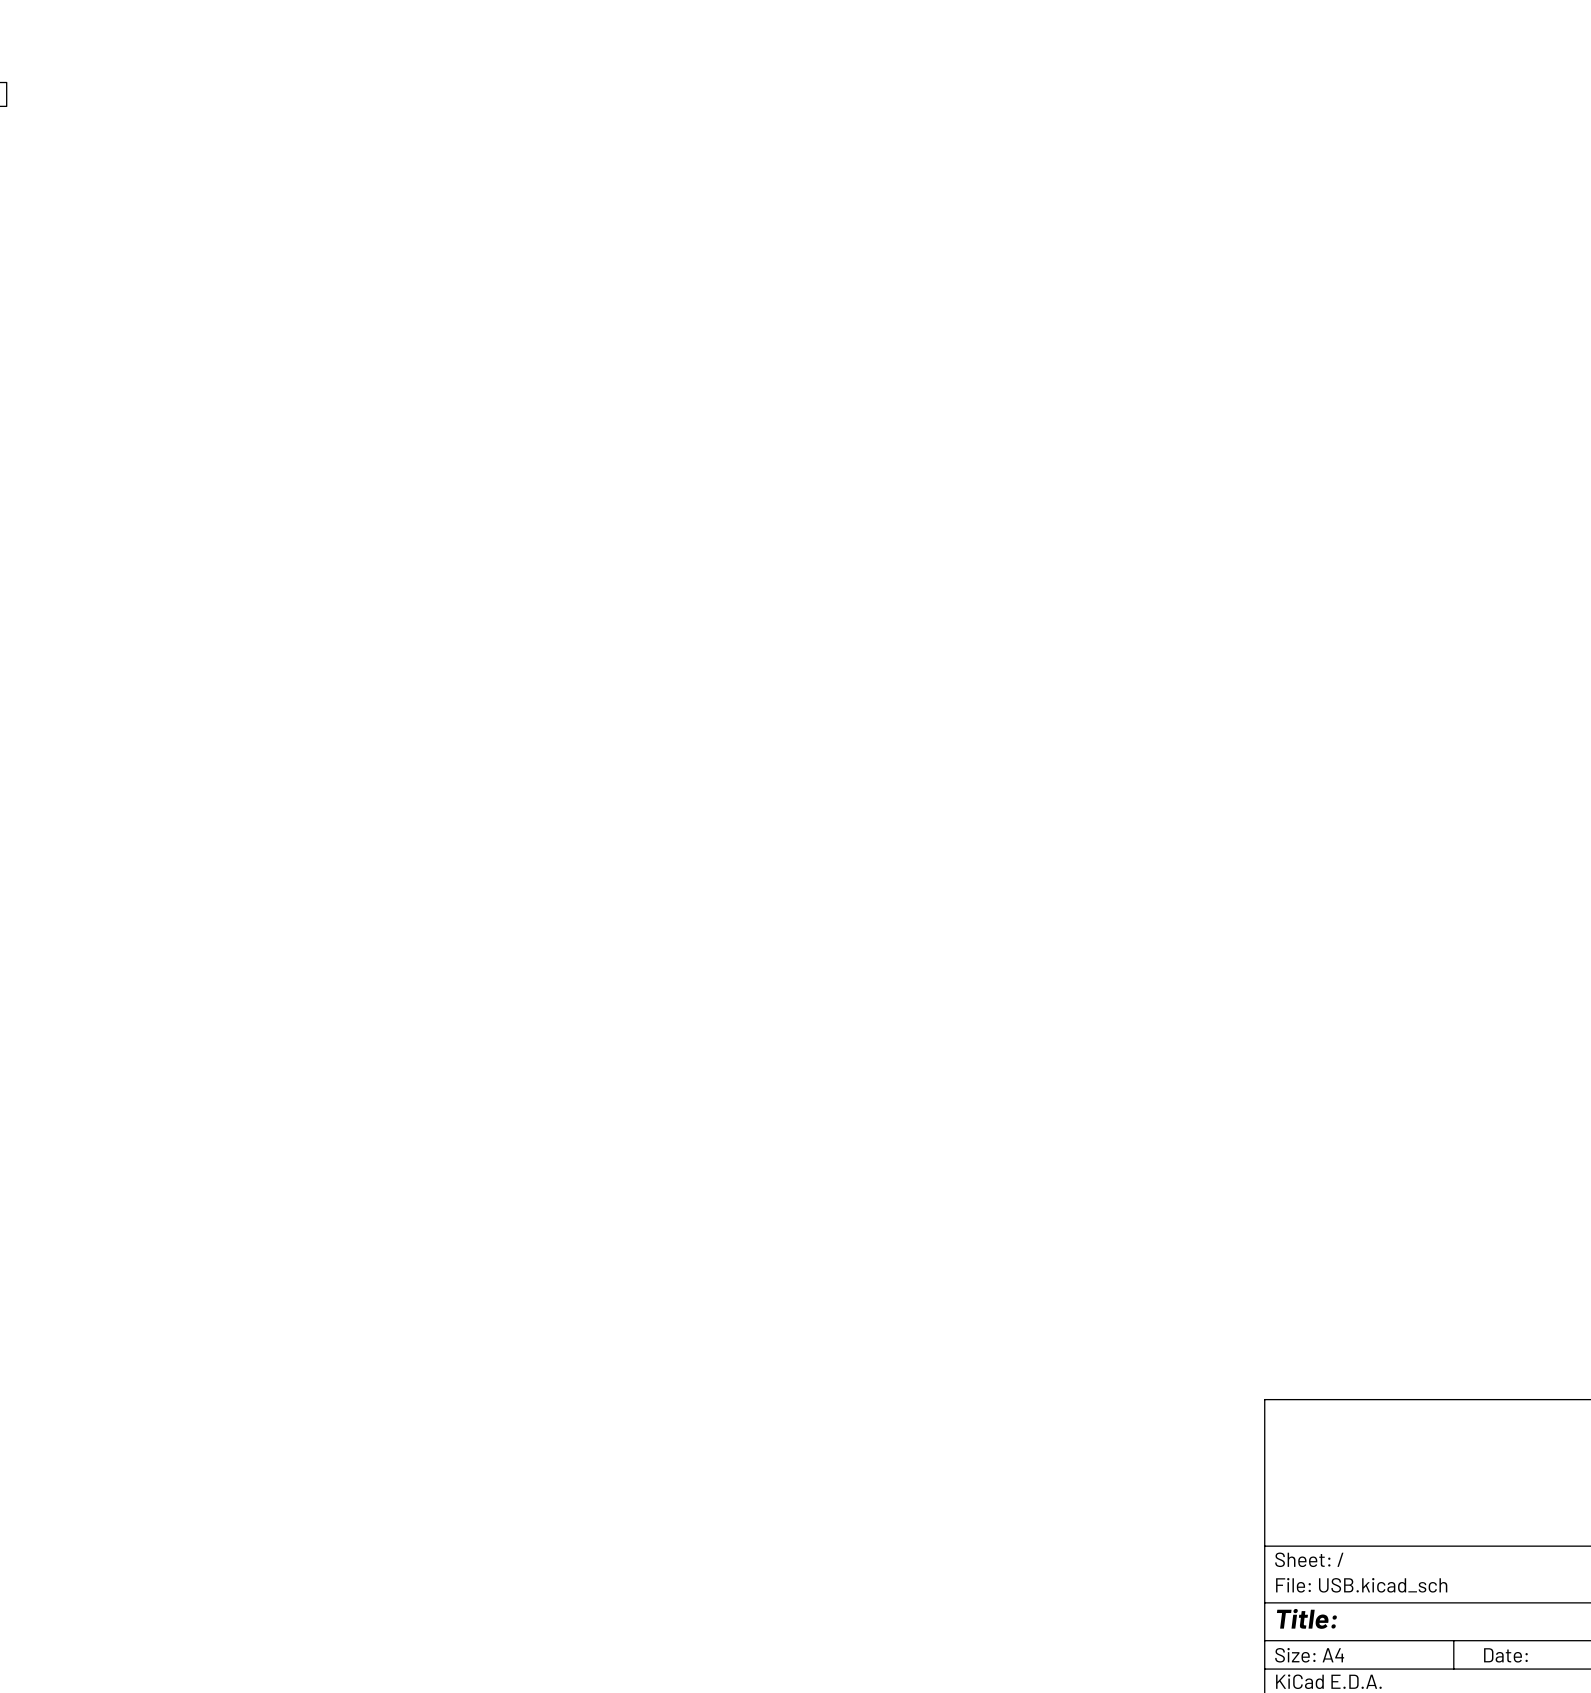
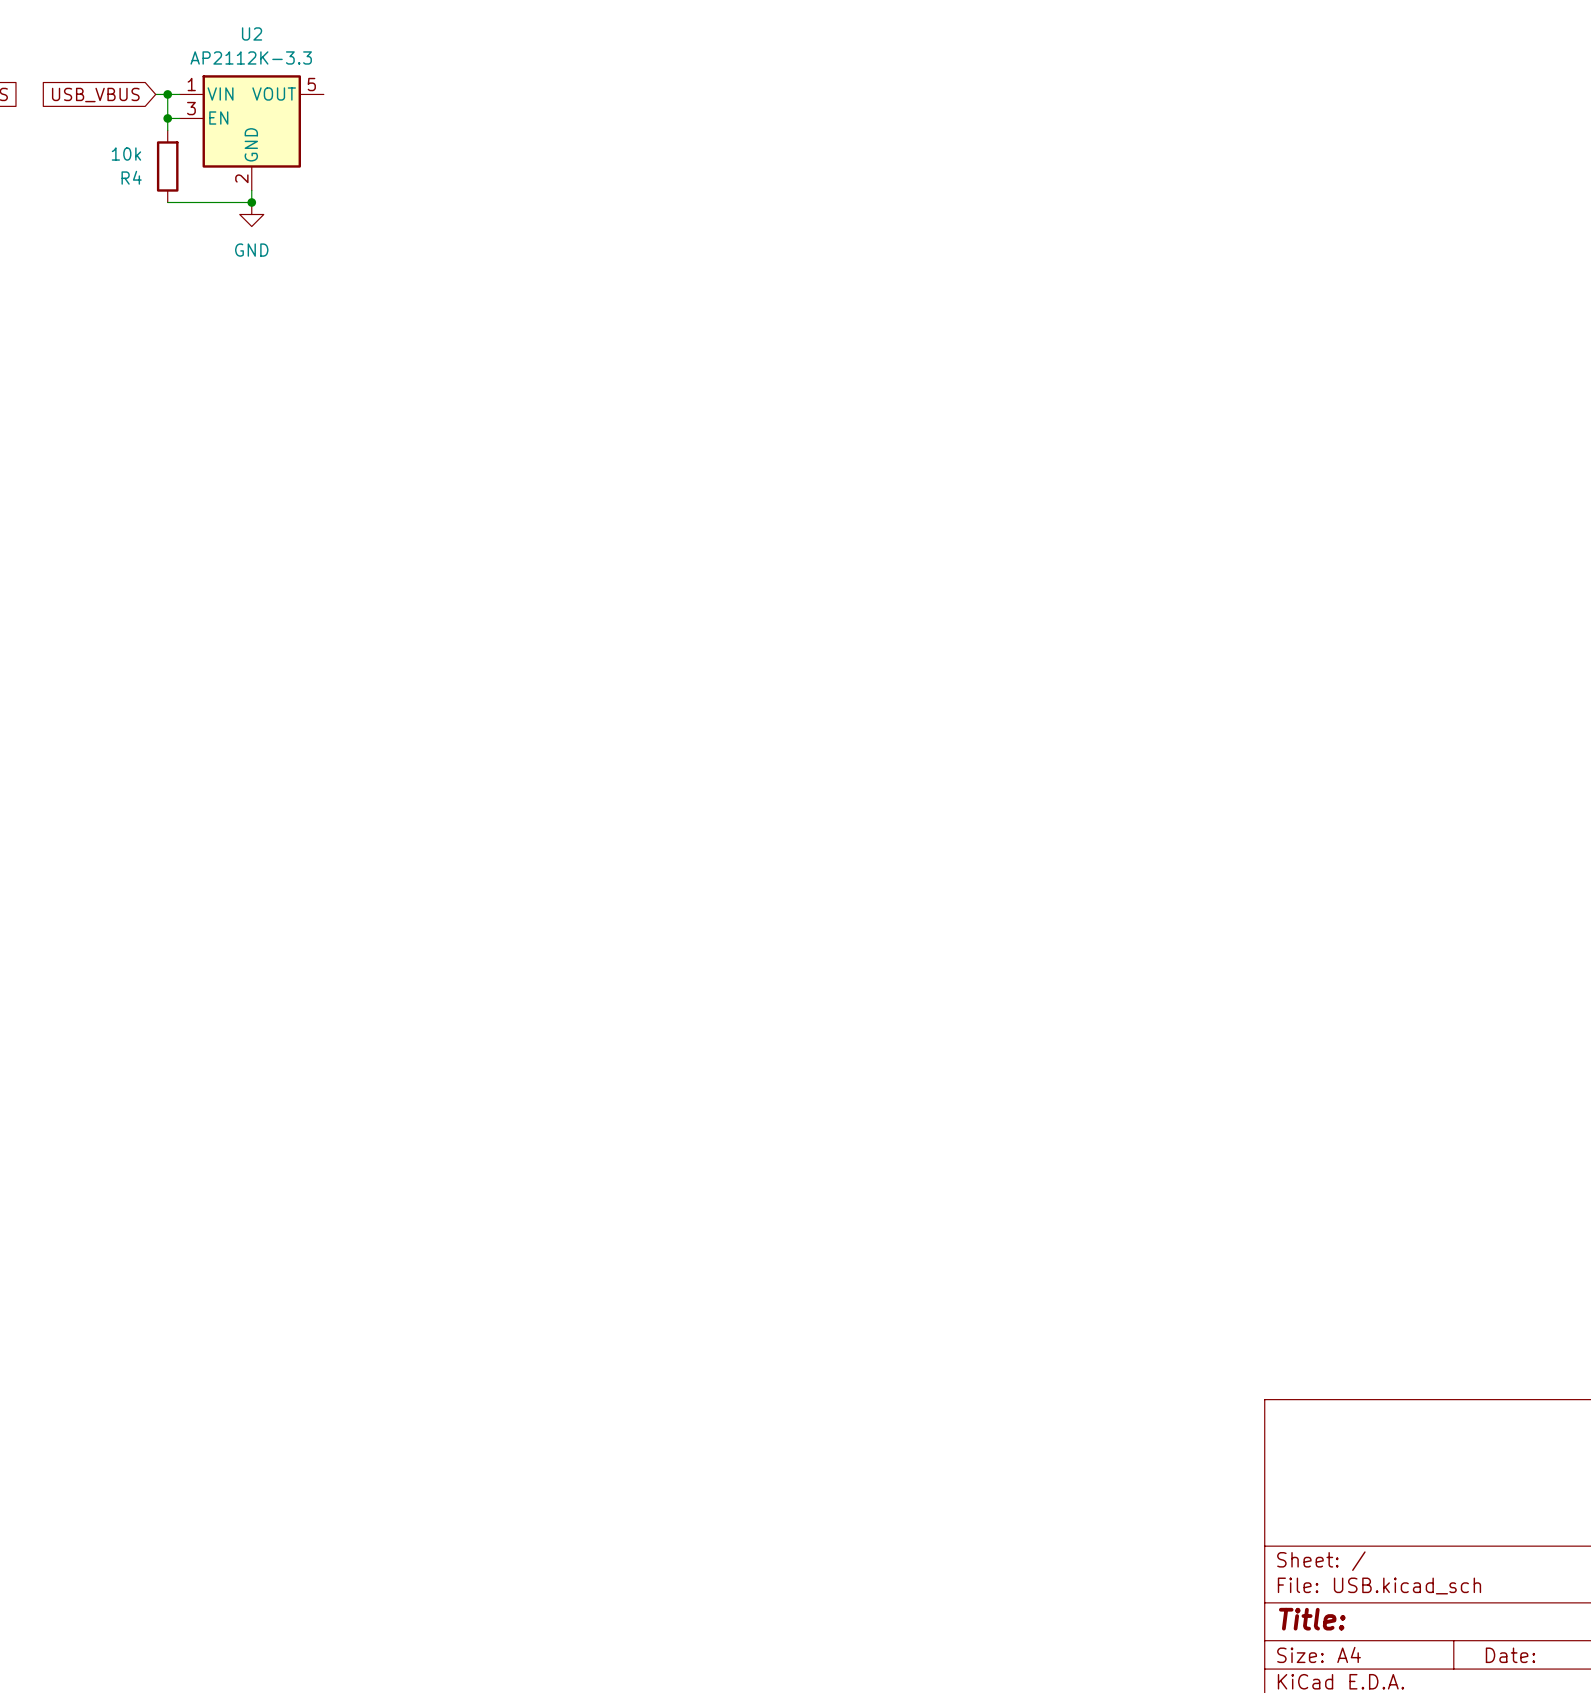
global label: none -> USB_VBUS (95, 95)
wire: none -> (155, 94) (179, 94)
wire: none -> (167, 94) (167, 130)
junction: none -> (167, 94)
wire: none -> (167, 118) (179, 118)
junction: none -> (167, 118)
U2: none -> AP2112K-3.3 (251, 132)
R4: none -> 10k (167, 166)
wire: none -> (251, 190) (251, 202) (167, 202)
junction: none -> (251, 202)
power symbol: none -> GND (251, 214)

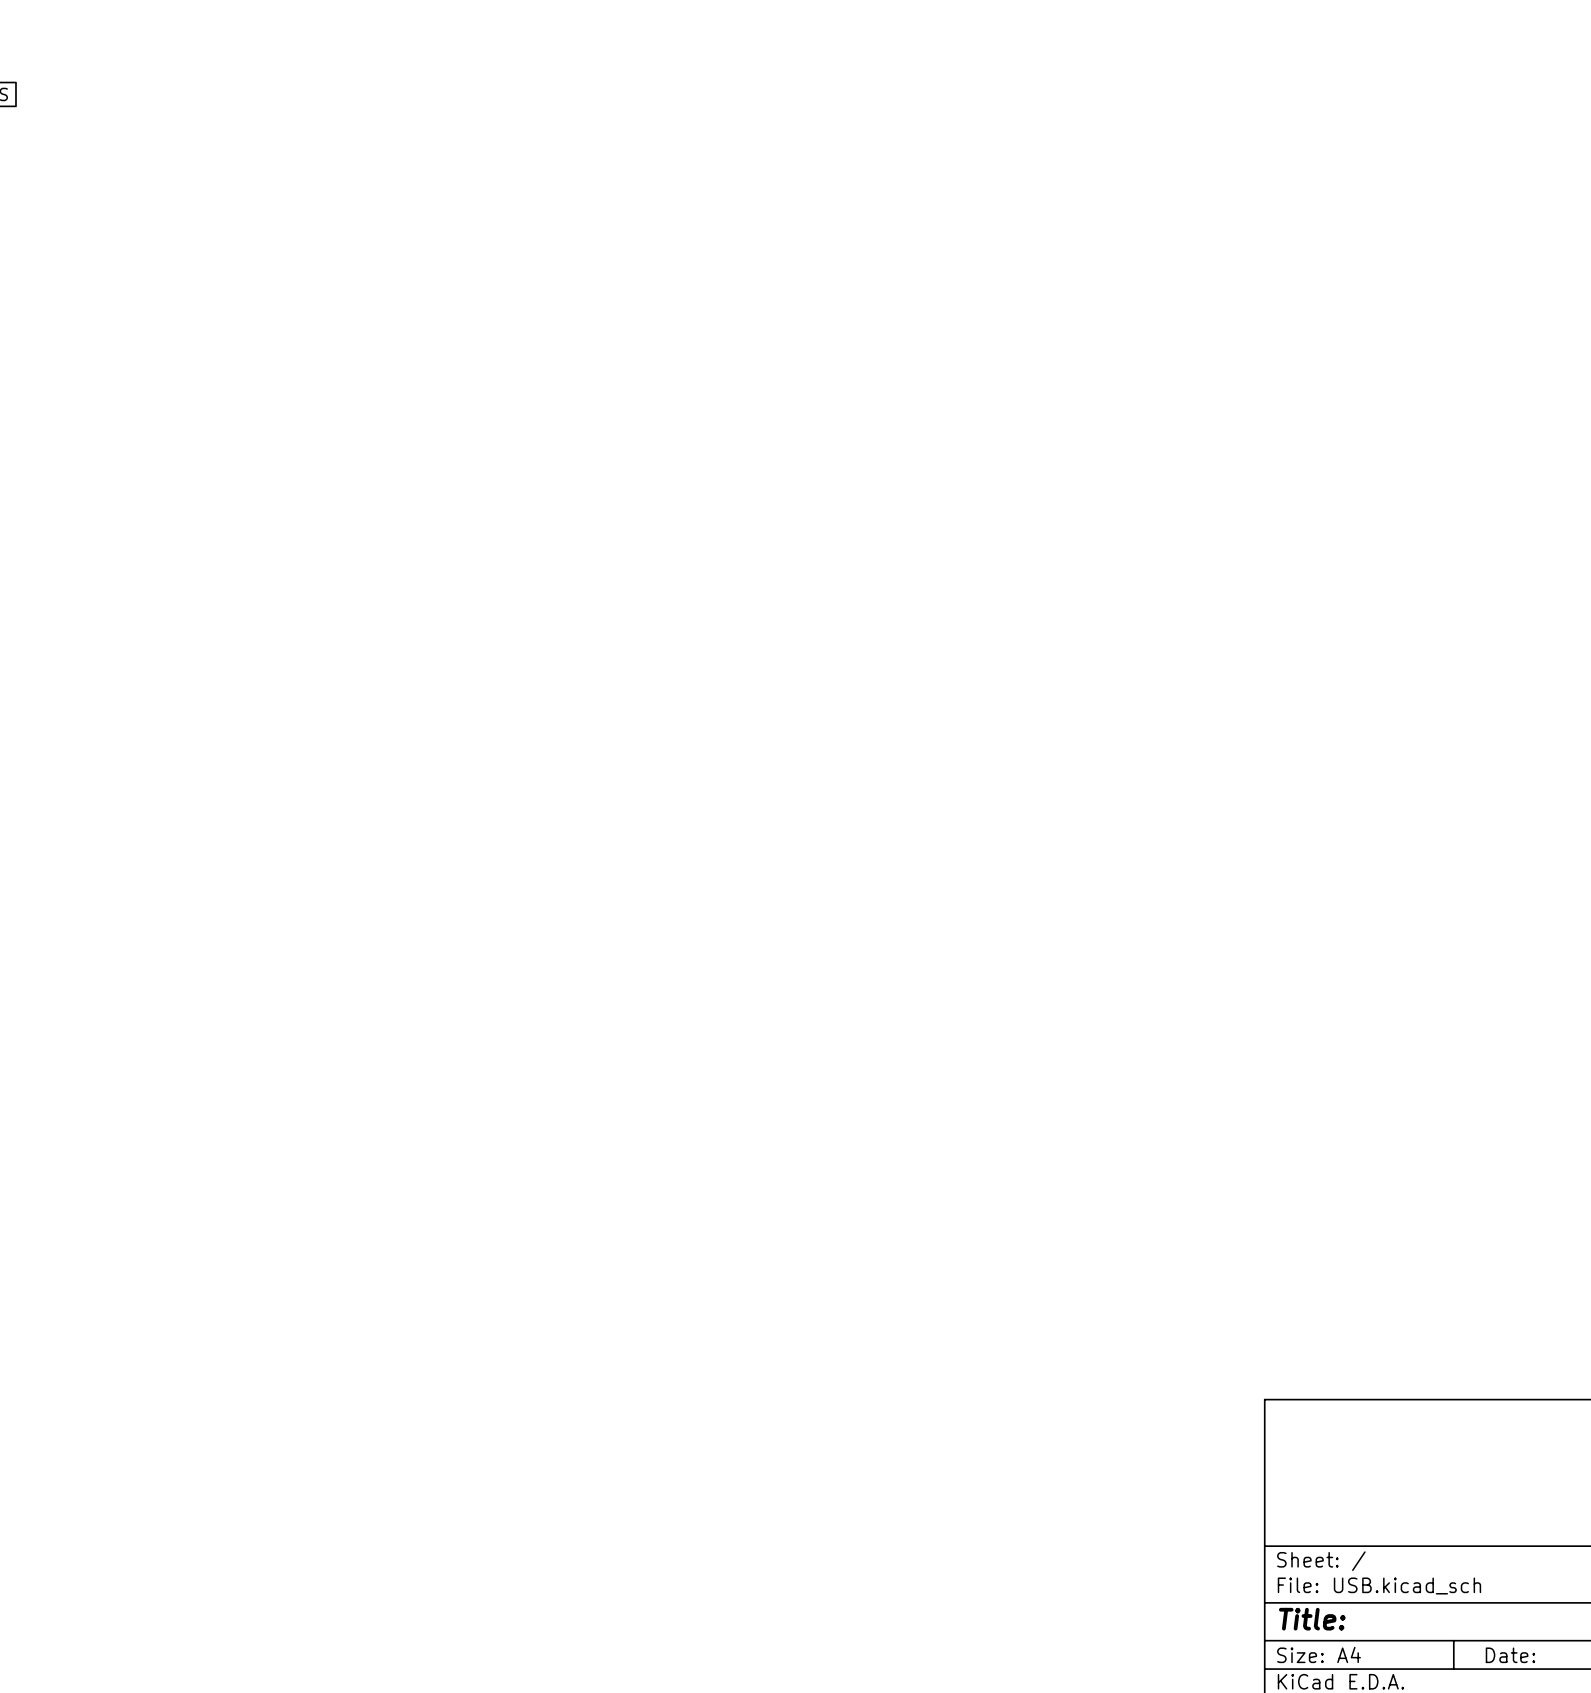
wire: (155, 94) (179, 94) -> none
wire: (167, 94) (167, 130) -> none
junction: (167, 94) -> none
global label: USB_VBUS (95, 95) -> none
wire: (167, 118) (179, 118) -> none
junction: (167, 118) -> none
U2: AP2112K-3.3 (251, 132) -> none
R4: 10k (167, 166) -> none
wire: (251, 190) (251, 202) (167, 202) -> none
junction: (251, 202) -> none
power symbol: GND (251, 214) -> none

